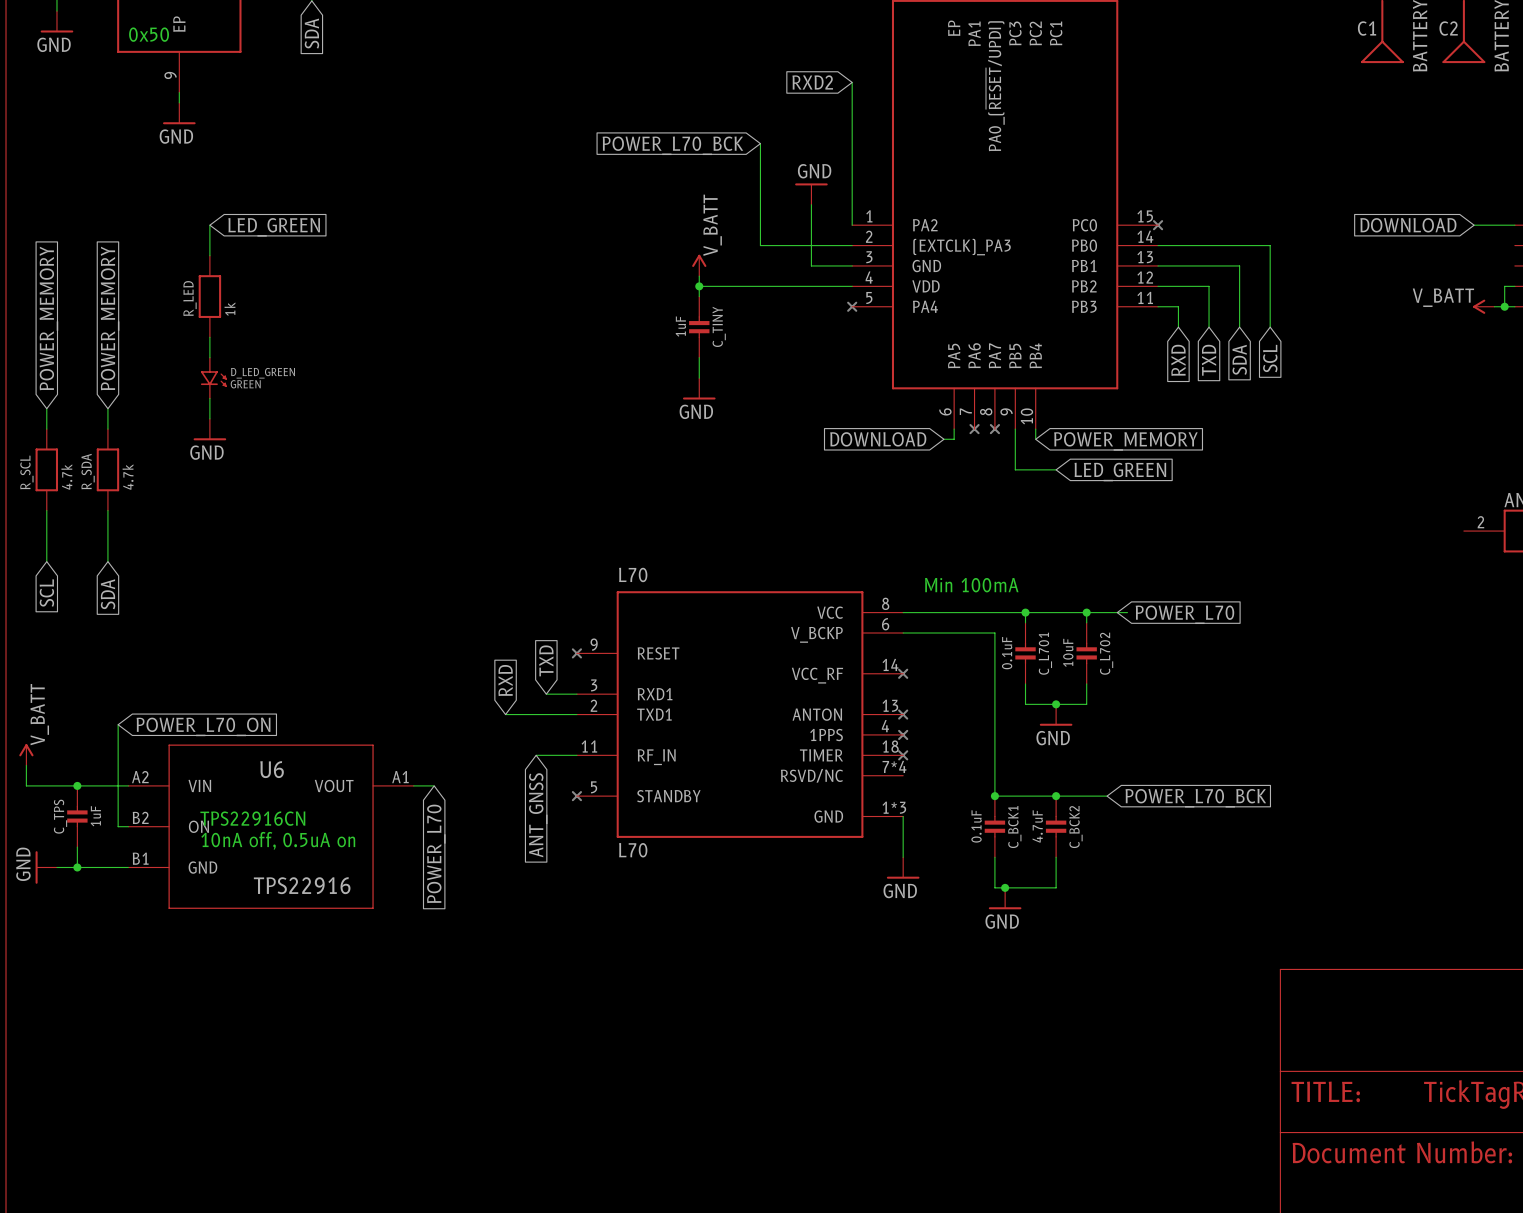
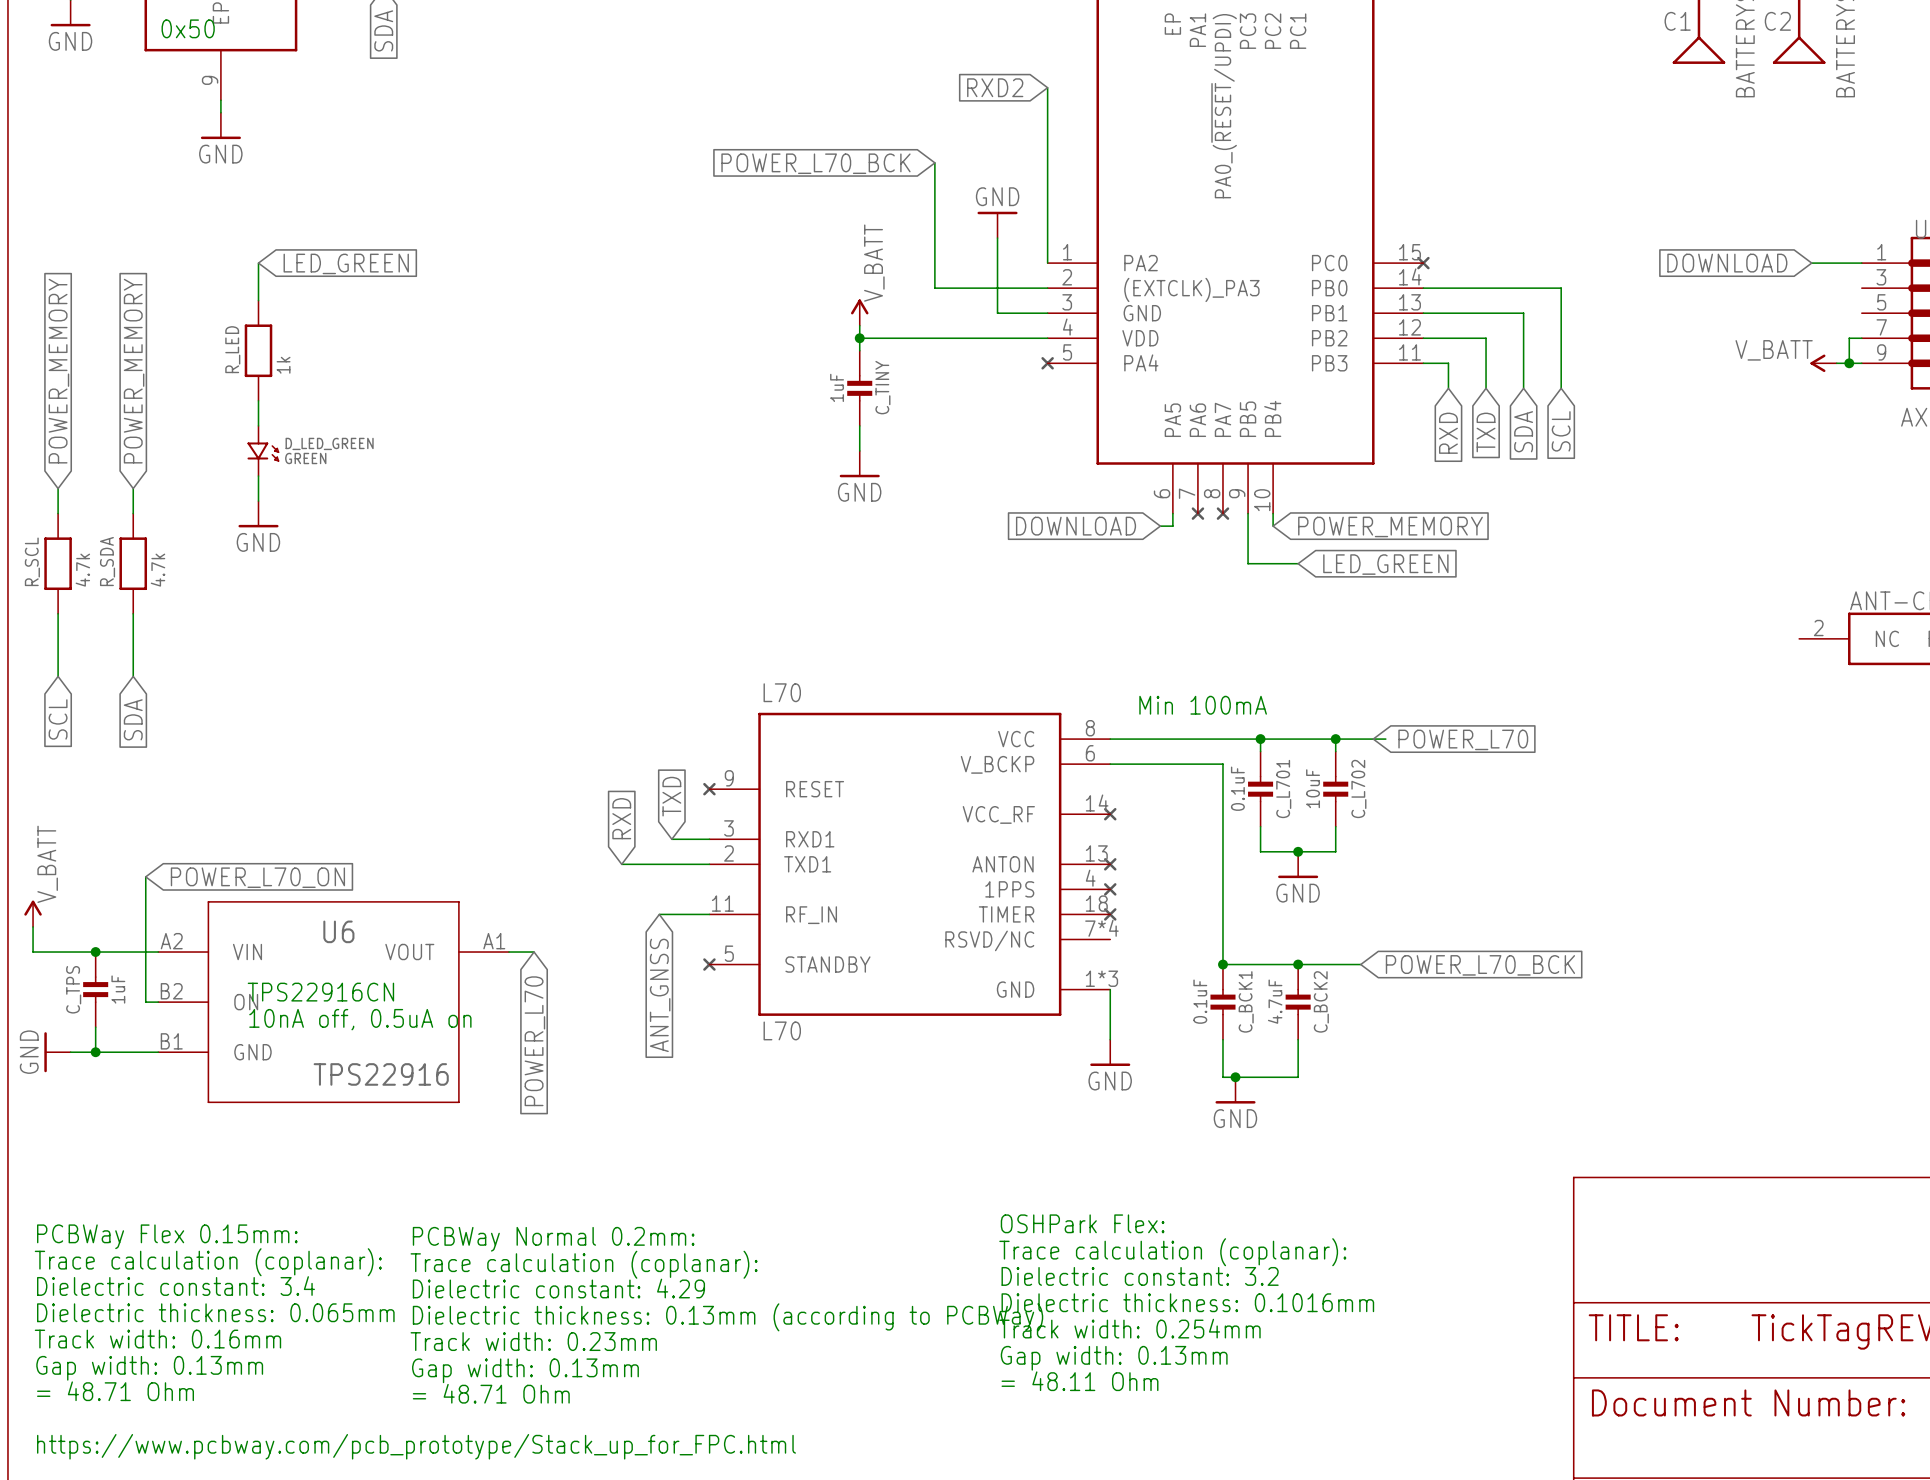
text: none -> OSHPark Flex: (1082, 1223)
text: none -> PCBWay Flex 0.15mm: (167, 1236)
text: none -> PCBWay Normal 0.2mm: (553, 1239)
text: none -> Trace calculation (coplanar): (1172, 1252)
text: none -> Trace calculation (coplanar): (208, 1262)
text: none -> Trace calculation (coplanar): (584, 1264)
text: none -> Dielectric constant: 3.2 (1140, 1276)
text: none -> Dielectric constant: 3.4 (176, 1286)
text: none -> Dielectric constant: 4.29 (558, 1288)
text: none -> Dielectric thickness: 0.1016mm (1187, 1302)
text: none -> Dielectric thickness: 0.065mm (215, 1312)
text: none -> Dielectric thickness: 0.13mm (according to PCBWay) (728, 1317)
text: none -> Track width: 0.254mm (1129, 1328)
text: none -> Track width: 0.16mm (157, 1339)
text: none -> Track width: 0.23mm (533, 1341)
text: none -> Gap width: 0.13mm (1114, 1358)
text: none -> Gap width: 0.13mm (149, 1368)
text: none -> Gap width: 0.13mm (525, 1370)
text: none -> = 48.11 Ohm (1079, 1381)
text: none -> = 48.71 Ohm (115, 1391)
text: none -> = 48.71 Ohm (491, 1393)
text: none -> https://www.pcbway.com/pcb_prototype/Stack_up_for_FPC.html (416, 1446)

